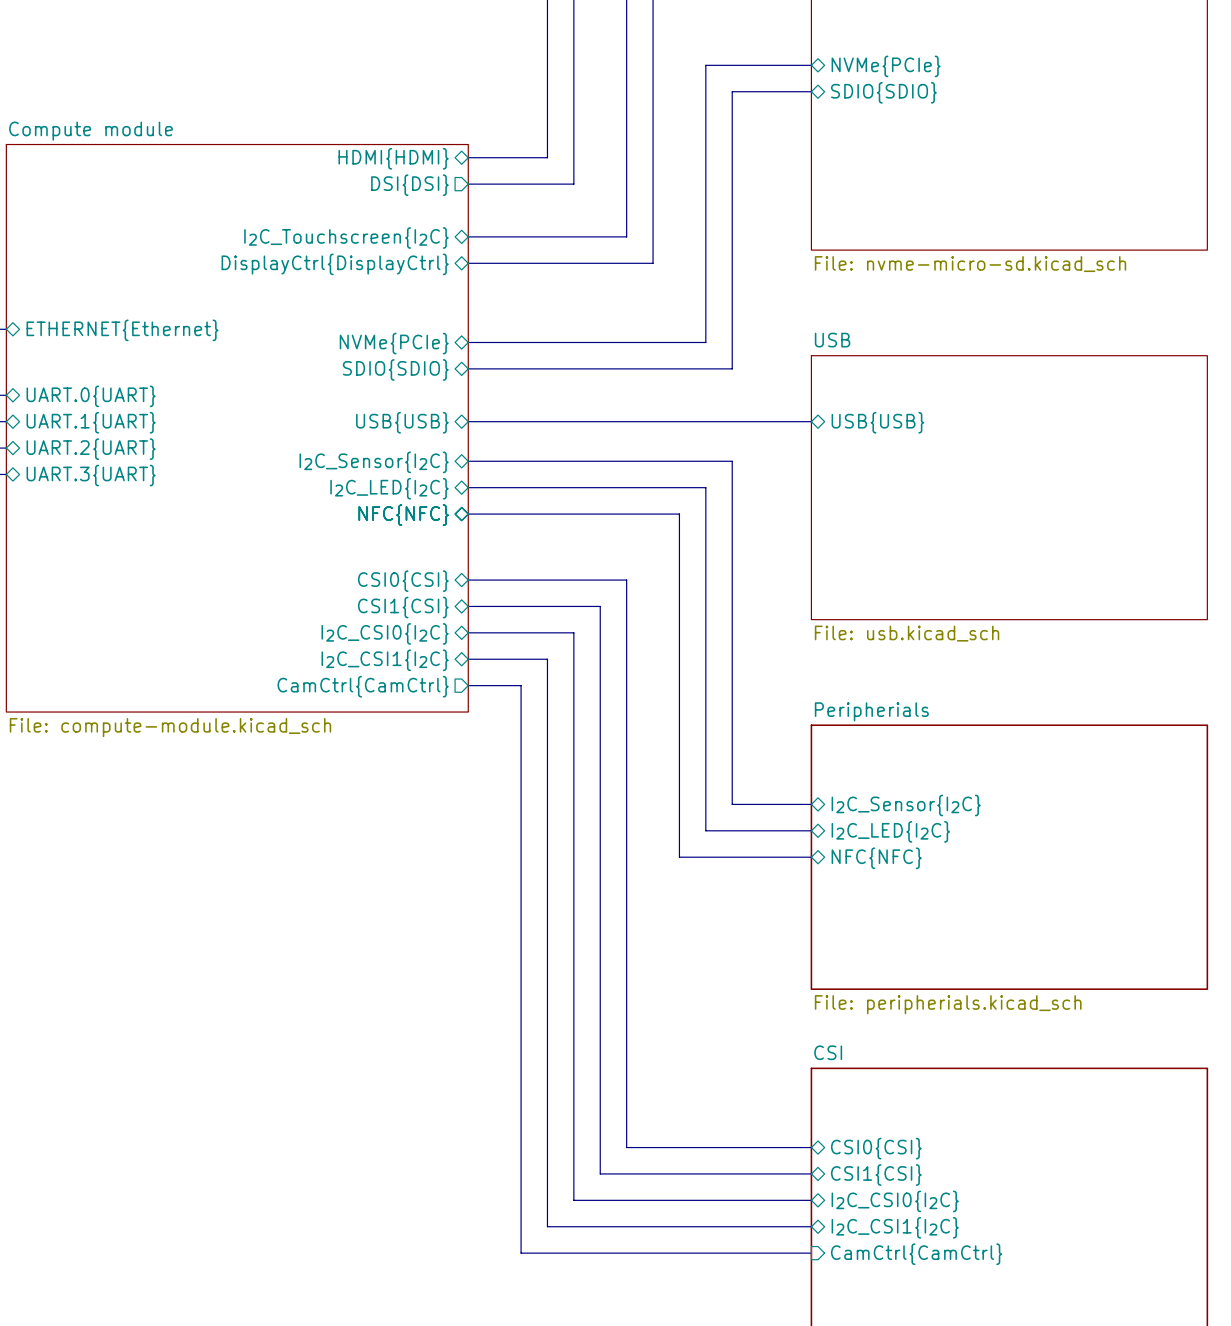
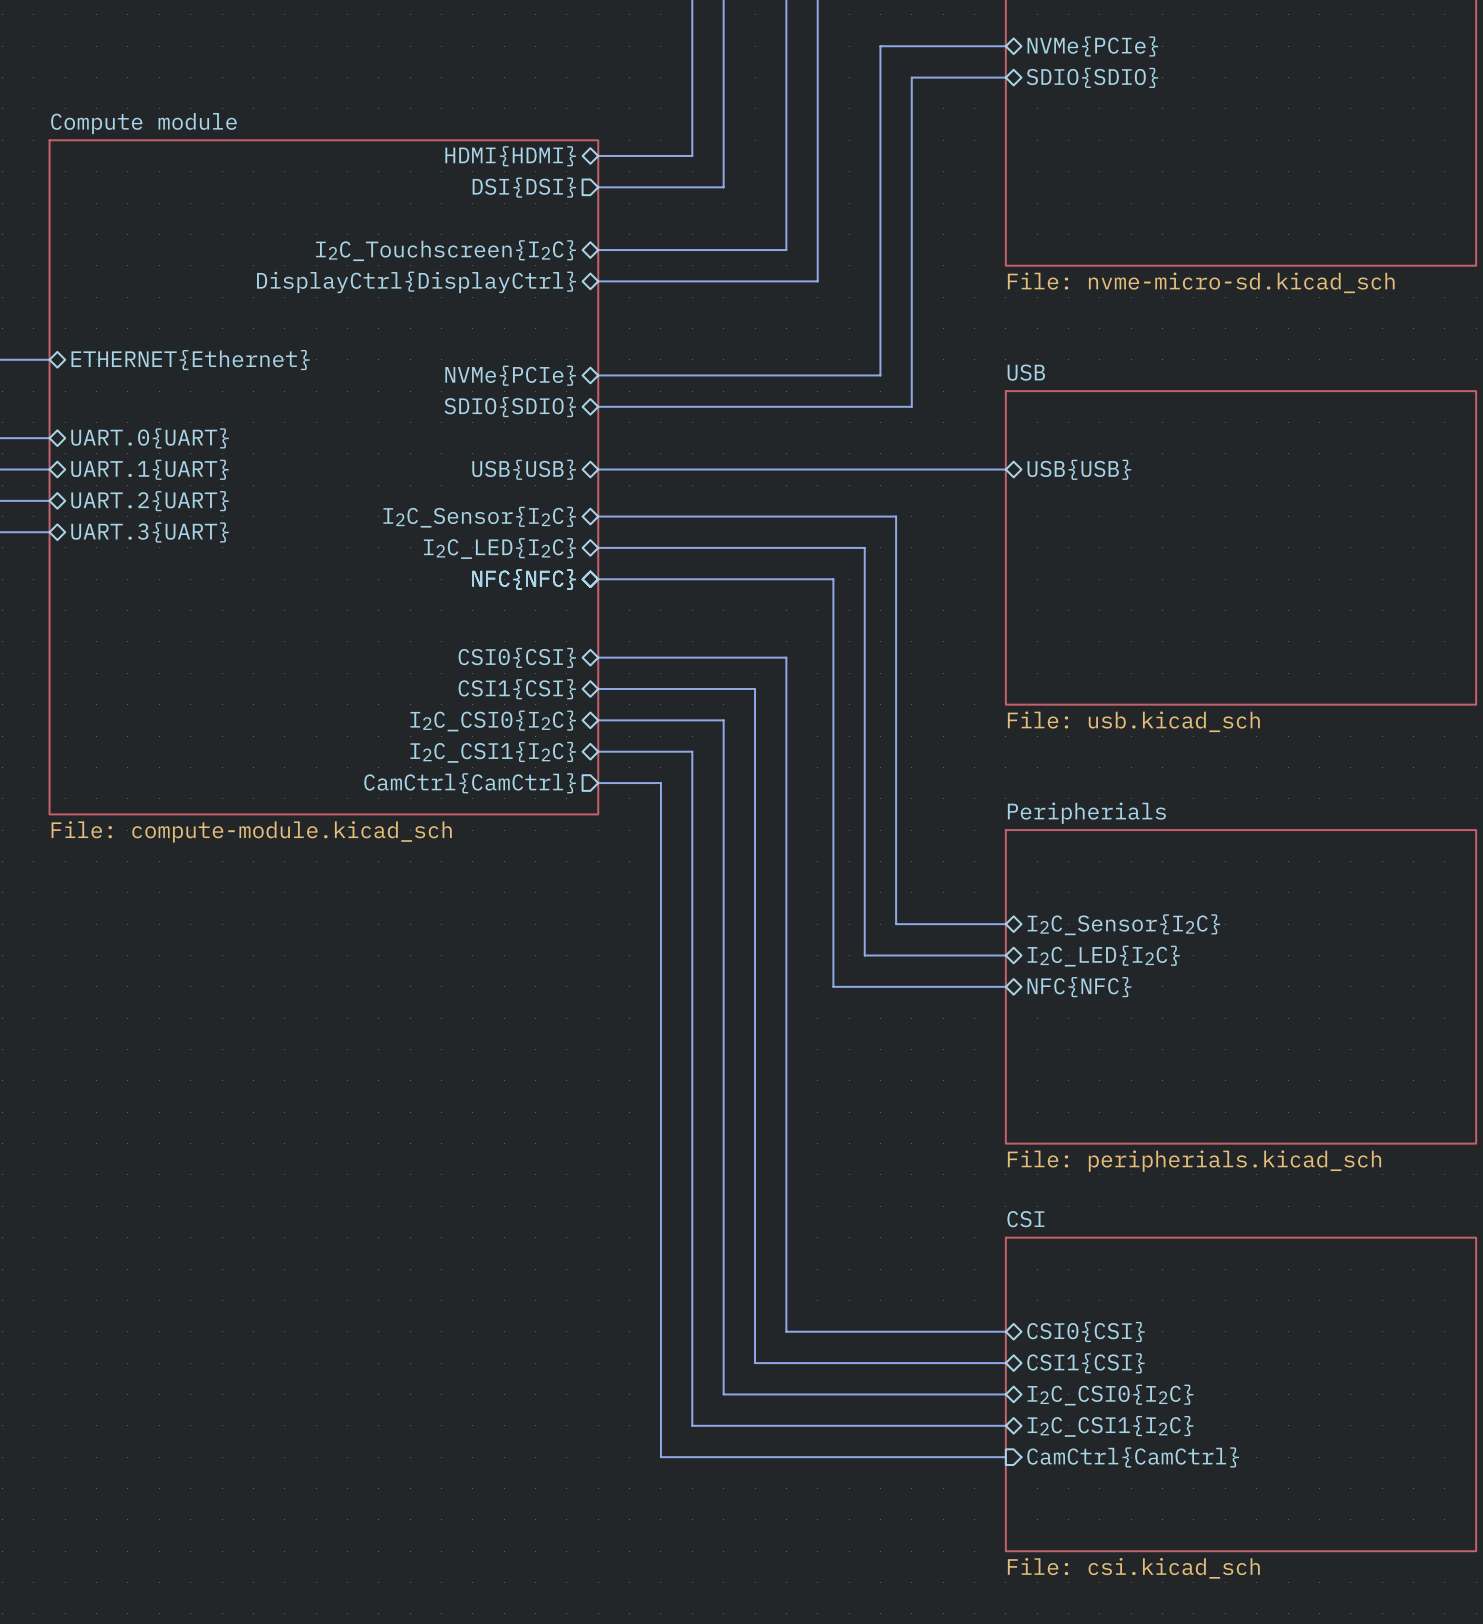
bus: (719, 461) (732, 461) (732, 804) -> (896, 516) (896, 924) (911, 924)
bus: (692, 487) (705, 487) (705, 830) -> (864, 547) (864, 955) (880, 955)
bus: (666, 514) (679, 514) (679, 857) -> (833, 579) (833, 986) (849, 986)

